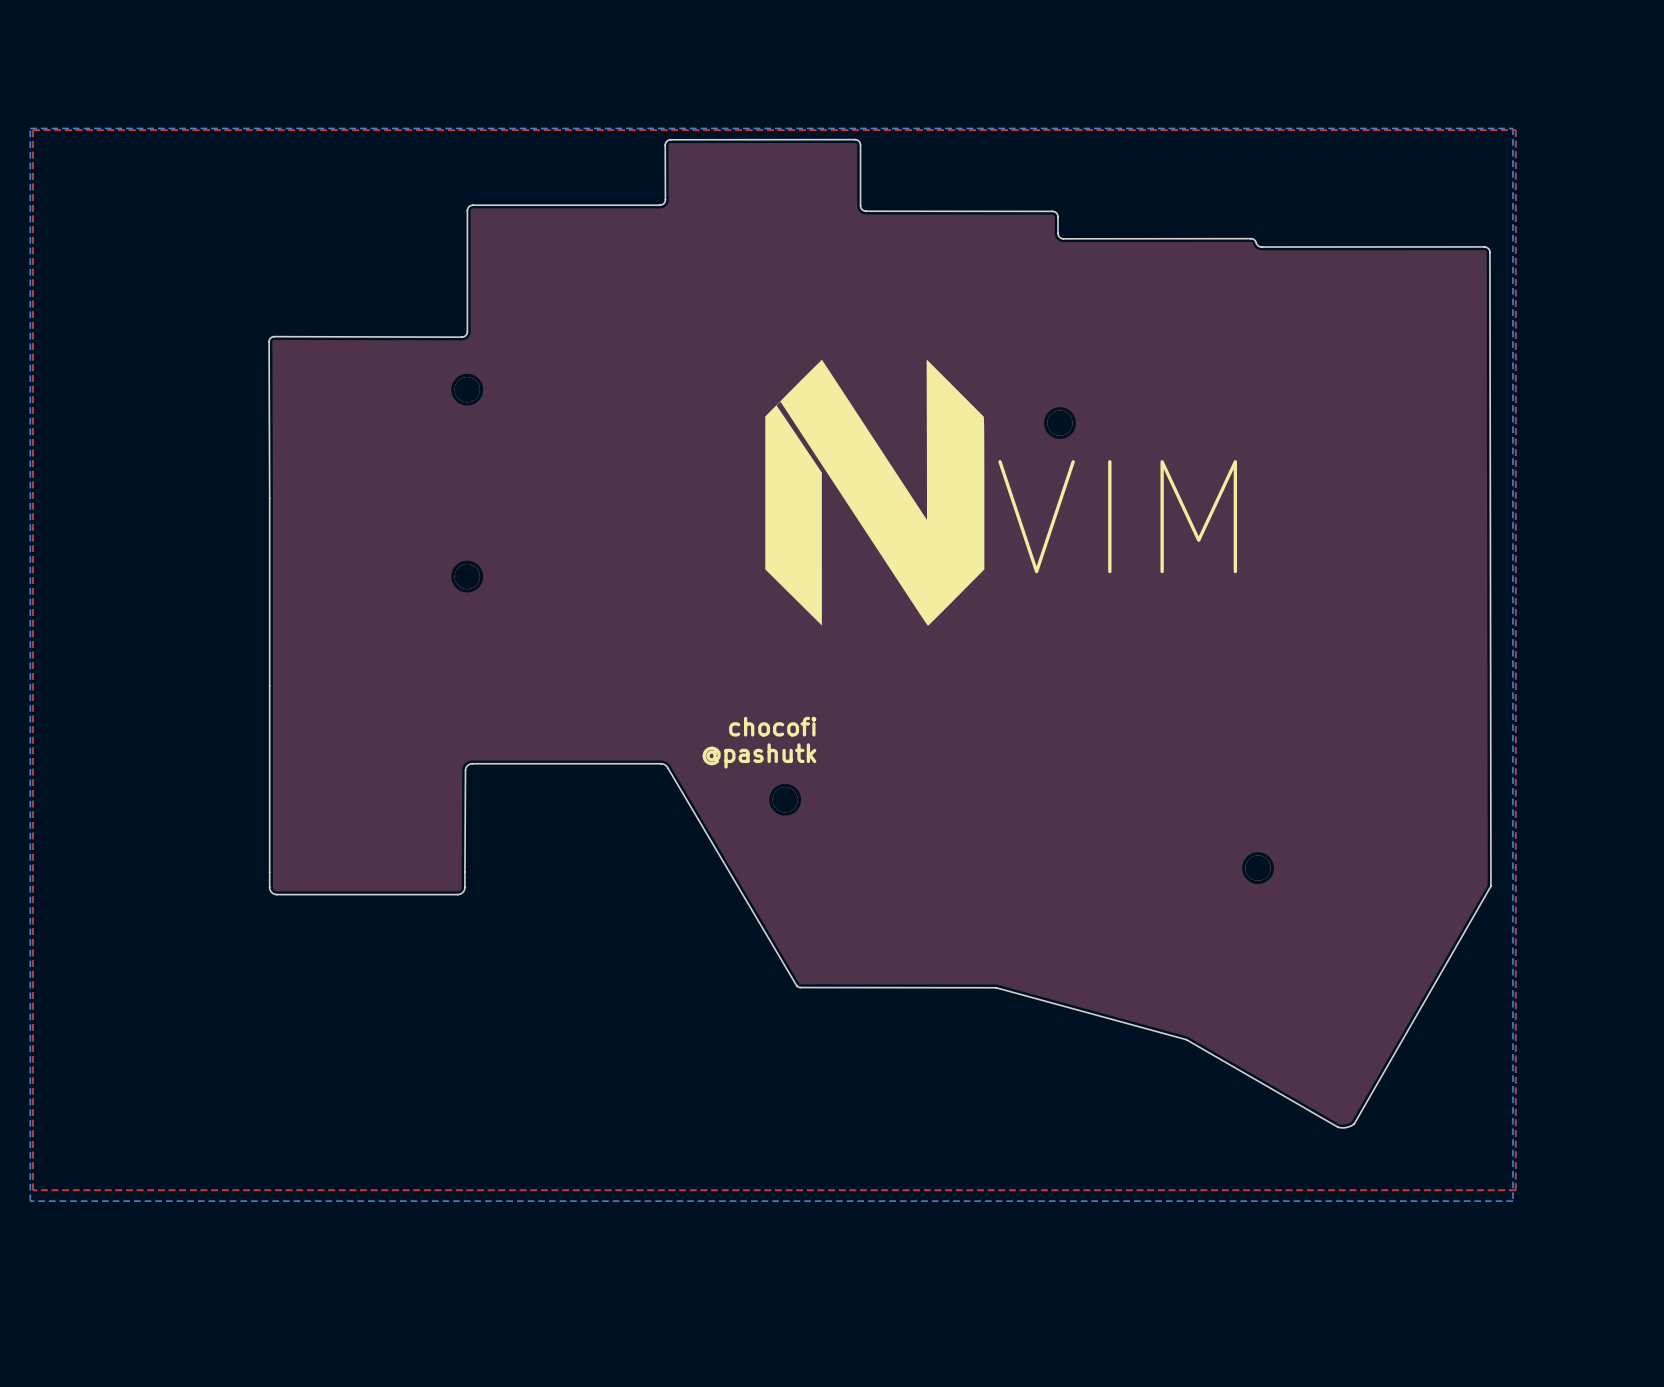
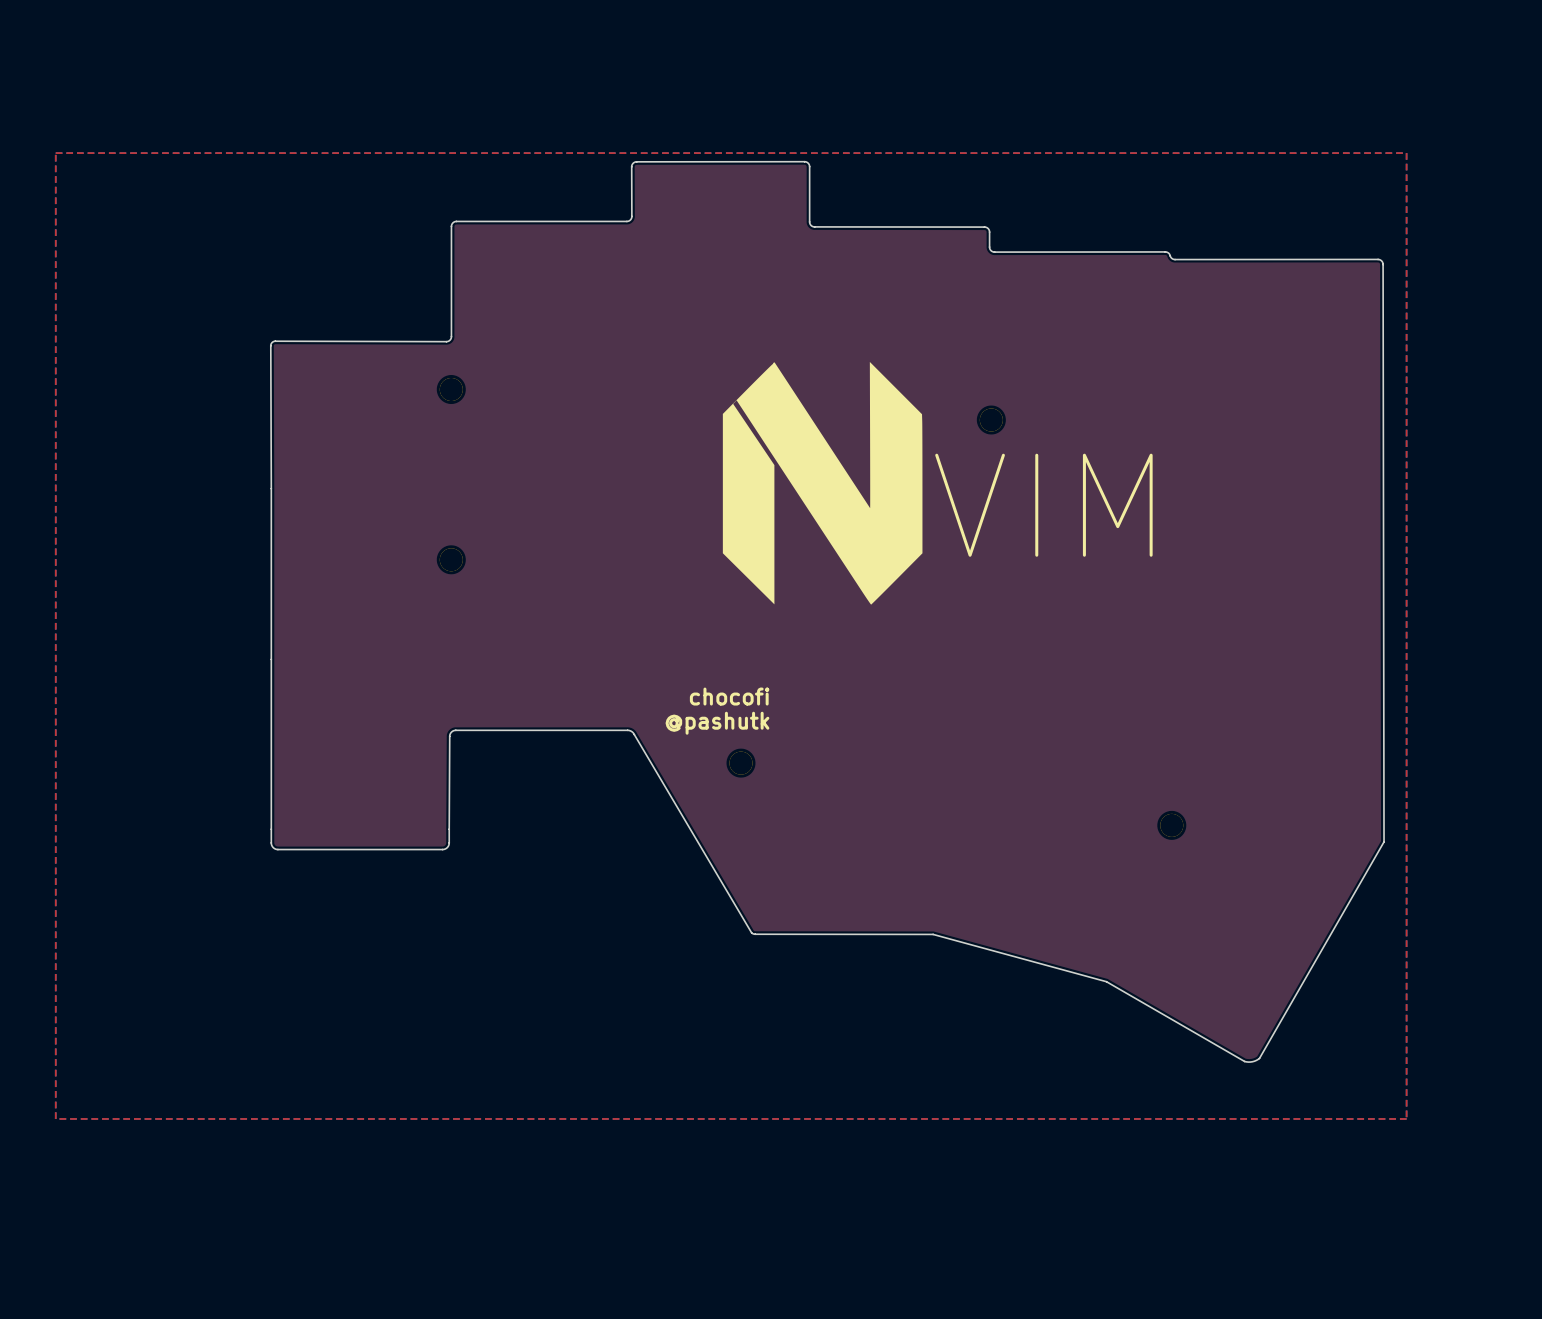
bottom zone outline: (30, 128) (30, 1201) (1512, 1201) (1512, 128) (30, 128) -> none

